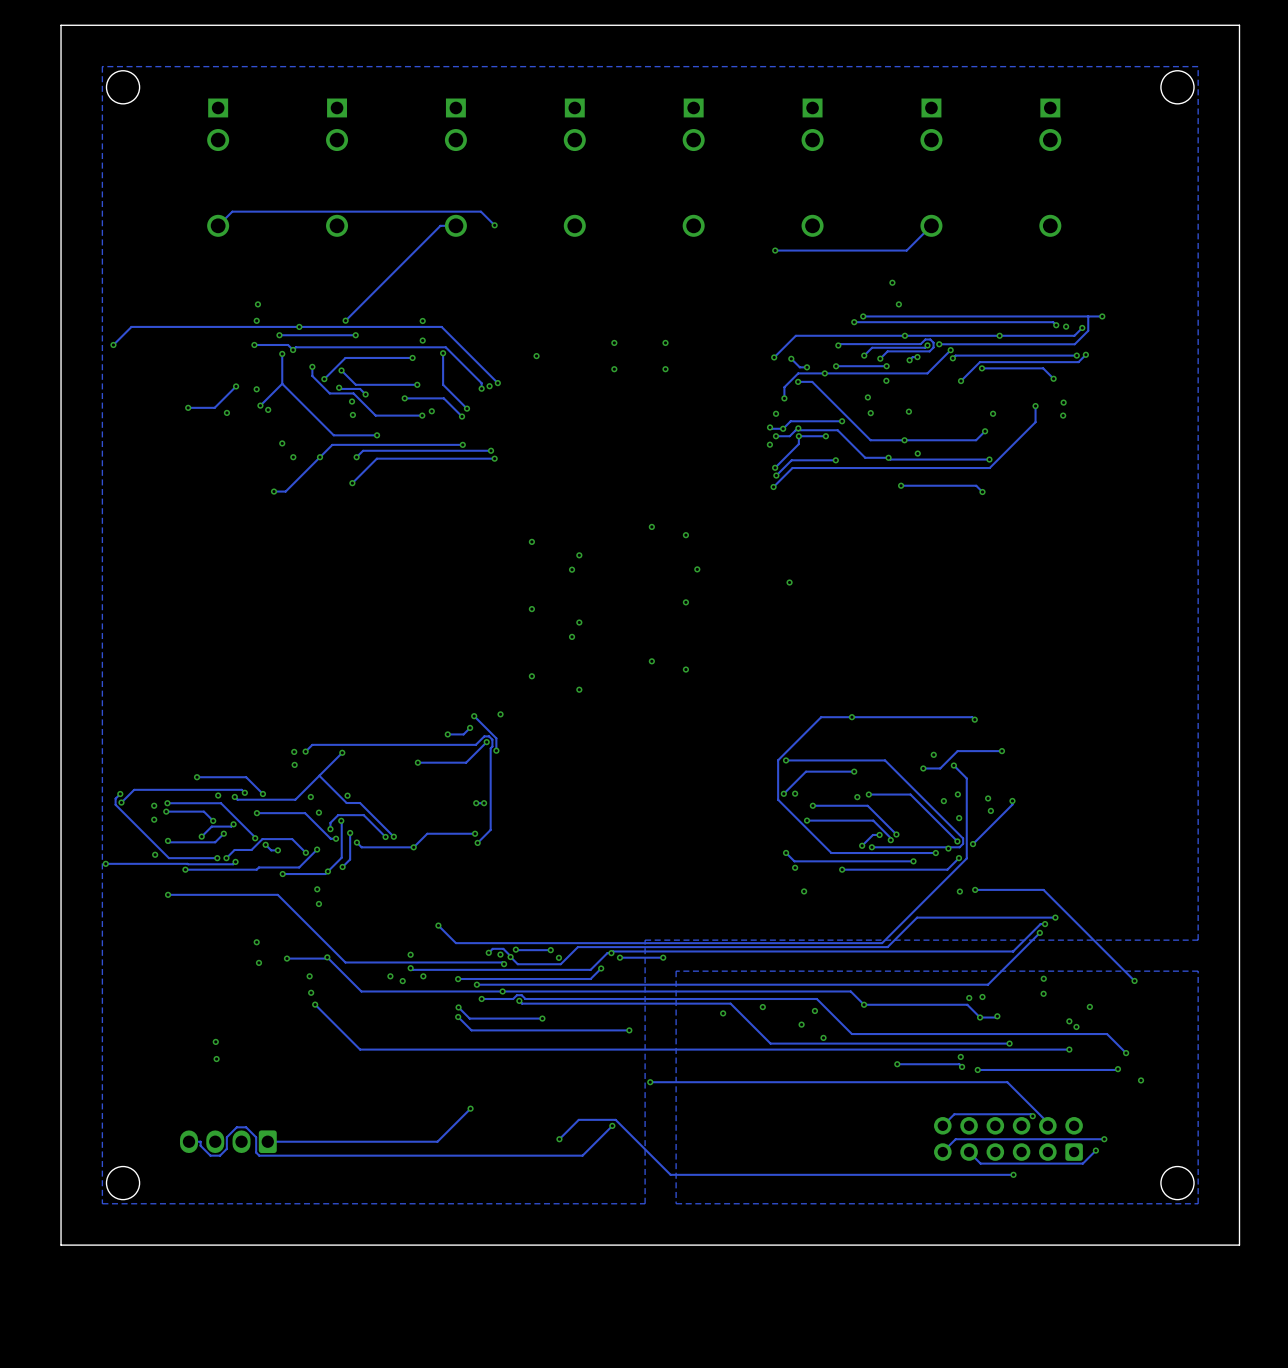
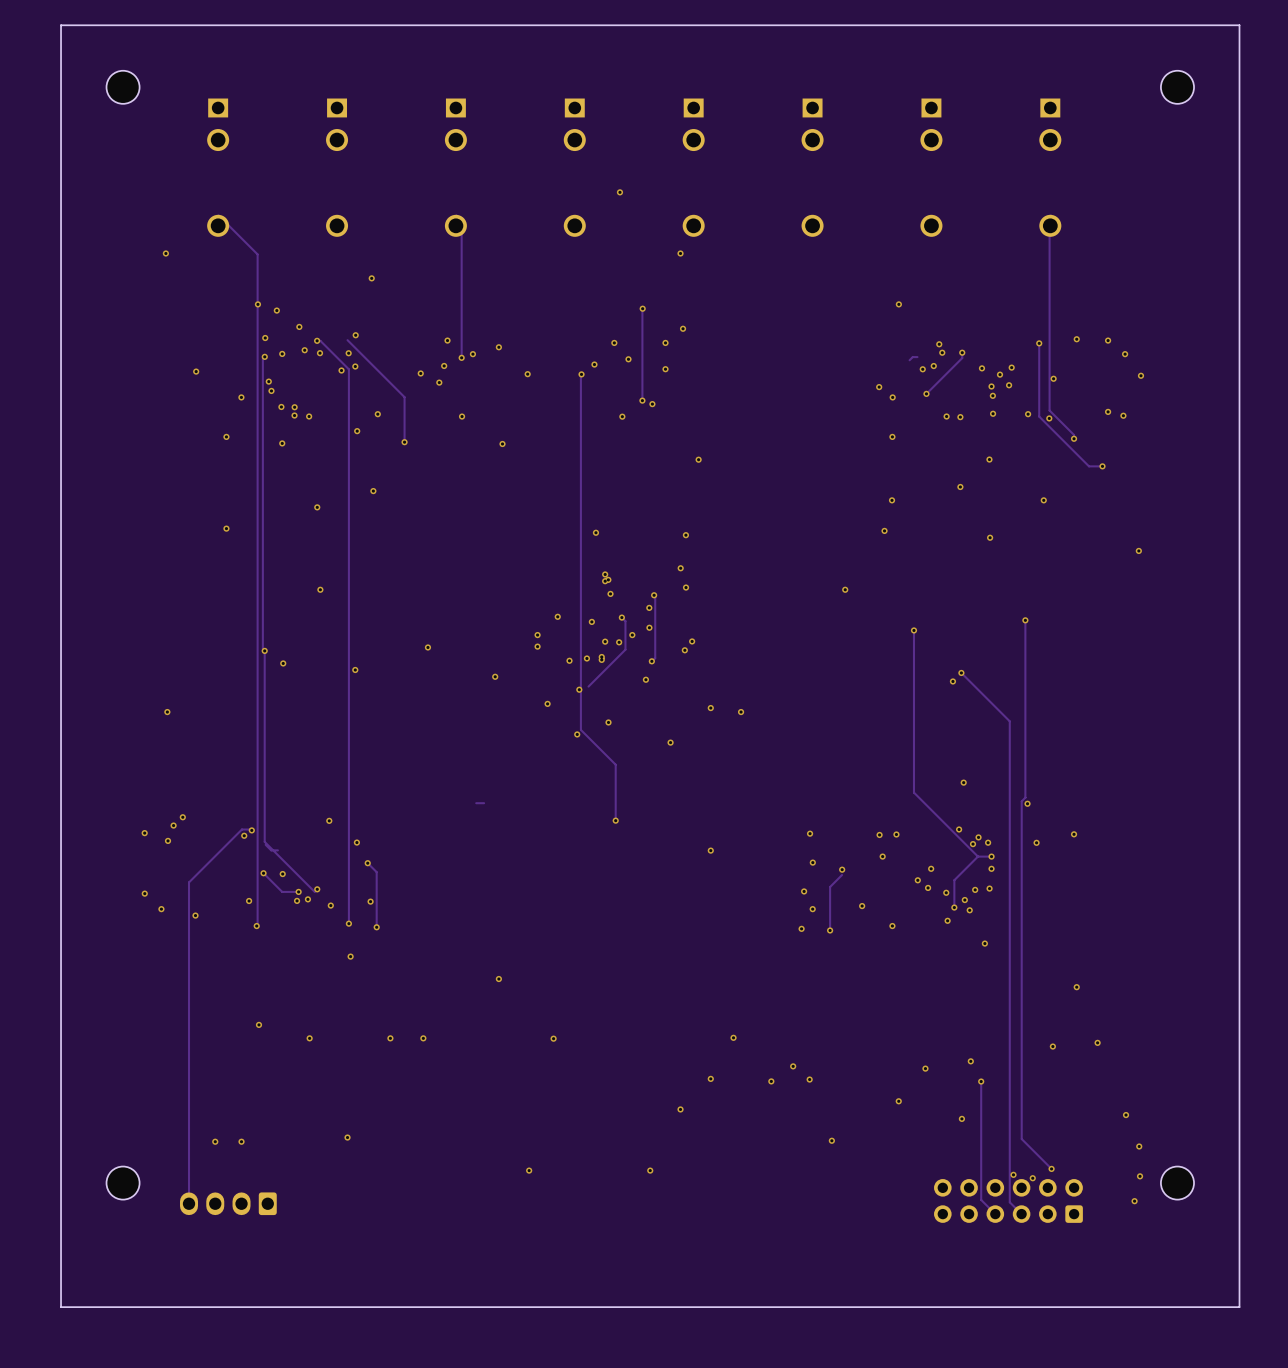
zone outline: (1198, 66) (102, 66) (102, 1203) (645, 1203) (645, 940) (1198, 940) (1198, 66) -> none
via: none -> (619, 192)
track: none -> (218, 215) (257, 254) (256, 926)
track: none -> (456, 215) (461, 220) (461, 357)
track: none -> (1050, 215) (1049, 410) (1074, 434) (1074, 438)
track: (455, 225) (440, 225) (345, 320) -> none
track: (494, 225) (480, 211) (232, 211) (218, 225) -> none
via: (494, 225) -> none
track: (931, 225) (906, 250) (775, 250) -> none
via: (775, 250) -> none
via: none -> (165, 253)
via: none -> (680, 253)
via: none -> (371, 278)
via: (892, 282) -> none
track: none -> (642, 308) (642, 400)
via: none -> (642, 308)
via: none -> (276, 310)
via: (863, 316) -> none
track: (1088, 316) (1088, 330) (1074, 344) (939, 344) -> none
track: (1102, 316) (863, 316) -> none
via: (1102, 316) -> none
via: (256, 320) -> none
via: (345, 320) -> none
via: (422, 320) -> none
track: (854, 322) (1053, 322) (1056, 325) -> none
via: (854, 322) -> none
via: (1056, 325) -> none
via: (1066, 326) -> none
track: (1082, 327) (1074, 335) (795, 335) (774, 357) -> none
via: (1082, 327) -> none
via: none -> (683, 328)
via: (279, 335) -> none
track: (355, 335) (279, 335) -> none
via: (904, 335) -> none
via: (999, 335) -> none
via: none -> (265, 338)
via: none -> (1076, 339)
track: none -> (317, 340) (320, 340) (348, 369) (348, 923)
via: none -> (317, 340)
track: none -> (347, 340) (404, 397) (404, 442)
via: (422, 340) -> none
via: none -> (447, 340)
via: none -> (1108, 340)
track: none -> (1039, 343) (1039, 416) (1089, 466) (1102, 466)
via: none -> (1039, 343)
track: (113, 344) (131, 326) (441, 326) (497, 383) -> none
via: (113, 344) -> none
track: (254, 344) (288, 344) (293, 349) (295, 347) (445, 347) (481, 383) (481, 388) -> none
via: (254, 344) -> none
track: (838, 345) (920, 344) (925, 339) (930, 339) (933, 342) (933, 347) (929, 351) (887, 351) (880, 358) -> none
via: (838, 345) -> none
track: (927, 345) (925, 347) (872, 347) (864, 355) -> none
via: (927, 345) -> none
via: none -> (498, 347)
via: (293, 349) -> none
via: none -> (304, 350)
track: (950, 350) (927, 373) (798, 373) (784, 387) (784, 398) -> none
via: (950, 350) -> none
via: none -> (942, 352)
track: none -> (962, 352) (962, 358) (926, 393)
via: none -> (962, 352)
track: (282, 353) (282, 383) -> none
via: none -> (320, 353)
via: none -> (348, 353)
track: (443, 353) (443, 384) (467, 408) -> none
via: (443, 353) -> none
via: none -> (472, 354)
track: (1085, 354) (1078, 362) (979, 362) (961, 381) -> none
via: (1085, 354) -> none
via: none -> (1125, 354)
via: (864, 355) -> none
track: (1076, 355) (955, 355) (952, 358) -> none
via: (1076, 355) -> none
track: none -> (264, 356) (262, 358) (264, 841) (314, 892)
via: none -> (264, 356)
via: (536, 356) -> none
track: (412, 357) (345, 357) (324, 379) -> none
via: (412, 357) -> none
via: none -> (461, 357)
via: (774, 357) -> none
via: (917, 357) -> none
track: (791, 358) (799, 367) (807, 367) -> none
via: (791, 358) -> none
via: (880, 358) -> none
via: (952, 358) -> none
via: none -> (628, 359)
via: (909, 360) -> none
via: none -> (594, 364)
via: none -> (444, 365)
track: (312, 366) (312, 376) (329, 393) (353, 393) (375, 415) (422, 415) -> none
via: (312, 366) -> none
via: none -> (355, 366)
via: (836, 366) -> none
track: (886, 366) (836, 366) -> none
via: (886, 366) -> none
via: none -> (933, 366)
via: (807, 367) -> none
via: none -> (1011, 367)
track: (981, 368) (1043, 368) (1053, 378) -> none
via: (614, 369) -> none
via: none -> (922, 369)
track: (341, 370) (355, 384) (417, 384) -> none
via: none -> (196, 371)
via: none -> (420, 373)
via: (824, 373) -> none
via: none -> (527, 374)
track: none -> (581, 374) (580, 729) (615, 764) (615, 820)
via: none -> (581, 374)
via: none -> (1000, 374)
via: none -> (1140, 375)
via: (324, 379) -> none
via: (886, 380) -> none
via: none -> (268, 381)
track: (798, 381) (812, 381) (870, 440) (976, 440) (985, 431) -> none
via: (798, 381) -> none
via: (961, 381) -> none
via: none -> (439, 382)
track: (282, 383) (333, 435) (377, 435) -> none
track: (282, 383) (260, 405) -> none
via: (497, 383) -> none
via: (417, 384) -> none
via: none -> (1009, 385)
track: (236, 386) (214, 407) (188, 407) -> none
via: (236, 386) -> none
via: (489, 386) -> none
via: none -> (991, 386)
track: (339, 387) (360, 388) (365, 394) -> none
via: (339, 387) -> none
via: none -> (879, 387)
via: (481, 388) -> none
via: (256, 389) -> none
via: none -> (271, 390)
via: none -> (926, 393)
via: (365, 394) -> none
via: none -> (992, 395)
via: none -> (241, 397)
via: (867, 397) -> none
via: none -> (892, 397)
track: (404, 398) (443, 398) (462, 416) -> none
via: (404, 398) -> none
via: (784, 398) -> none
via: none -> (642, 400)
via: (352, 401) -> none
via: (1063, 402) -> none
via: none -> (652, 404)
via: (260, 405) -> none
via: none -> (281, 406)
track: (1035, 406) (1035, 422) (989, 468) (792, 468) (773, 486) -> none
via: (1035, 406) -> none
via: (188, 407) -> none
via: none -> (294, 407)
via: (467, 408) -> none
via: (268, 409) -> none
via: (431, 411) -> none
via: (908, 411) -> none
via: none -> (1108, 411)
via: (226, 412) -> none
via: (776, 413) -> none
via: (870, 413) -> none
via: (352, 414) -> none
via: none -> (377, 414)
via: none -> (1028, 414)
via: none -> (294, 415)
via: (422, 415) -> none
via: (1063, 415) -> none
via: none -> (1123, 415)
via: none -> (309, 416)
via: none -> (622, 416)
via: none -> (946, 416)
via: none -> (960, 417)
via: none -> (1049, 418)
track: (842, 421) (790, 421) (783, 428) (770, 427) -> none
via: (842, 421) -> none
via: (770, 427) -> none
via: (783, 428) -> none
via: (798, 428) -> none
via: none -> (357, 431)
via: (985, 431) -> none
via: (377, 435) -> none
via: none -> (226, 436)
track: (775, 436) (789, 436) (795, 430) (837, 430) (865, 457) (989, 459) -> none
via: (775, 436) -> none
via: (798, 436) -> none
track: (825, 436) (798, 436) (798, 444) (775, 467) -> none
via: (825, 436) -> none
via: none -> (892, 436)
via: none -> (1074, 438)
via: (904, 440) -> none
via: none -> (404, 442)
via: none -> (502, 443)
track: (462, 444) (332, 444) (285, 491) (274, 491) -> none
via: (462, 444) -> none
via: (769, 444) -> none
track: (491, 450) (363, 450) (356, 457) -> none
via: (491, 450) -> none
via: (917, 453) -> none
via: (293, 457) -> none
via: (320, 457) -> none
via: (356, 457) -> none
via: (888, 457) -> none
track: (494, 458) (376, 458) (352, 483) -> none
via: (494, 458) -> none
via: none -> (698, 459)
track: (835, 460) (791, 460) (776, 475) -> none
via: (835, 460) -> none
via: none -> (1102, 466)
via: (775, 467) -> none
via: (776, 475) -> none
via: (352, 483) -> none
track: (901, 485) (976, 485) (982, 492) -> none
via position: (901, 485) -> (892, 500)
via: (773, 486) -> none
via: (274, 491) -> none
via: none -> (373, 491)
via position: (982, 492) -> (960, 486)
via: none -> (1043, 500)
via: none -> (317, 507)
via: (651, 526) -> none
via: none -> (226, 528)
via: none -> (884, 530)
via: none -> (595, 532)
via: none -> (990, 537)
via: (531, 541) -> none
via: none -> (1138, 550)
via: (579, 555) -> none
via: none -> (680, 568)
via: (572, 569) -> none
via: (697, 569) -> none
via: none -> (605, 574)
via: none -> (608, 579)
via: none -> (605, 581)
via: (789, 582) -> none
via: none -> (686, 587)
via: none -> (320, 589)
via: none -> (845, 589)
via: none -> (610, 593)
track: none -> (654, 595) (655, 658) (650, 663)
via: none -> (654, 595)
via: (685, 602) -> none
via: none -> (649, 607)
via: (531, 609) -> none
via: none -> (557, 616)
track: none -> (621, 617) (625, 621) (625, 649) (588, 686)
via: none -> (621, 617)
track: none -> (1025, 620) (1025, 797) (1021, 801) (1021, 1139) (1051, 1168)
via: none -> (1025, 620)
via: none -> (591, 621)
via: (579, 622) -> none
via: none -> (649, 627)
track: none -> (913, 630) (913, 792) (977, 856)
via: none -> (913, 630)
via: none -> (537, 635)
via: none -> (632, 635)
via: (572, 636) -> none
via: none -> (605, 641)
via: none -> (692, 641)
via: none -> (619, 642)
via: none -> (537, 646)
via: none -> (427, 647)
via: none -> (264, 650)
via: none -> (684, 650)
via: none -> (601, 657)
via: none -> (586, 658)
via: none -> (601, 659)
via: none -> (569, 660)
via: none -> (283, 663)
via: none -> (355, 669)
via: (685, 669) -> none
track: none -> (961, 672) (1009, 721) (1009, 1202) (1021, 1214)
via: none -> (961, 672)
via: none -> (495, 676)
via: (531, 676) -> none
via: none -> (645, 679)
via: none -> (952, 681)
via: none -> (547, 703)
via: none -> (710, 708)
via: none -> (167, 712)
via: none -> (741, 712)
via: (500, 714) -> none
track: (474, 716) (496, 738) (496, 750) -> none
via: (474, 716) -> none
via: (851, 717) -> none
track: (974, 719) (972, 717) (821, 717) (778, 760) (778, 799) (831, 853) (935, 853) -> none
via: (974, 719) -> none
via: none -> (608, 722)
track: (470, 727) (463, 734) (447, 734) -> none
via: (470, 727) -> none
via: (447, 734) -> none
via: none -> (577, 734)
track: (486, 742) (466, 762) (417, 762) -> none
via: (486, 742) -> none
via: none -> (670, 742)
via: (496, 750) -> none
via: (294, 751) -> none
track: (305, 751) (312, 744) (475, 744) (484, 736) (489, 736) (492, 739) (490, 748) (490, 829) (477, 842) -> none
via: (305, 751) -> none
track: (1001, 751) (957, 751) (940, 768) (923, 768) -> none
via: (1001, 751) -> none
track: (342, 752) (319, 775) -> none
via: (342, 752) -> none
via: (933, 754) -> none
track: (786, 760) (885, 760) (963, 838) (963, 843) (959, 847) (871, 847) -> none
via: (786, 760) -> none
via: (417, 762) -> none
via: (294, 764) -> none
track: (953, 765) (966, 778) (966, 858) (882, 943) (455, 943) (438, 925) -> none
via: (953, 765) -> none
via: (923, 768) -> none
track: (854, 771) (805, 771) (783, 793) -> none
via: (854, 771) -> none
track: (319, 775) (295, 799) (237, 799) (234, 796) -> none
track: (319, 775) (346, 803) (360, 803) (393, 836) -> none
track: (197, 777) (246, 777) (262, 793) -> none
via: (197, 777) -> none
via: none -> (963, 782)
track: (244, 792) (241, 789) (134, 789) (121, 802) -> none
via: (244, 792) -> none
via: (262, 793) -> none
via: (783, 793) -> none
via: (795, 793) -> none
track: (120, 794) (115, 798) (115, 804) (168, 858) (217, 858) -> none
via: (120, 794) -> none
track: (868, 794) (910, 794) (957, 841) -> none
via: (868, 794) -> none
via: (957, 794) -> none
via: (218, 795) -> none
via: (347, 795) -> none
via: (234, 796) -> none
via: (310, 797) -> none
via: (857, 797) -> none
via: (988, 798) -> none
track: (1012, 800) (1012, 804) (973, 844) -> none
via position: (1012, 800) -> (1027, 803)
via: (943, 801) -> none
via: (121, 802) -> none
track: (167, 803) (220, 803) (255, 838) -> none
via: (167, 803) -> none
via: (476, 803) -> none
via: (484, 803) -> none
via: (154, 805) -> none
track: (812, 805) (867, 805) (896, 834) -> none
via: (812, 805) -> none
via: (990, 810) -> none
track: (166, 811) (203, 811) (213, 820) -> none
via: (166, 811) -> none
via: (318, 812) -> none
track: (256, 813) (305, 813) (330, 838) (336, 838) -> none
via: (256, 813) -> none
via: none -> (182, 817)
via: (959, 818) -> none
via: (154, 819) -> none
via: (213, 820) -> none
via: none -> (329, 820)
track: (341, 820) (341, 857) (325, 874) (282, 874) -> none
via: (341, 820) -> none
via: none -> (615, 820)
track: (807, 820) (873, 820) (890, 840) -> none
via position: (807, 820) -> (810, 833)
track: (233, 824) (231, 826) (211, 826) (201, 836) -> none
via: (233, 824) -> none
via: none -> (173, 825)
track: (330, 829) (330, 822) (338, 815) (363, 815) (385, 836) -> none
via: (330, 829) -> none
via: none -> (959, 829)
track: none -> (251, 830) (241, 829) (189, 882) (189, 1203)
via: none -> (251, 830)
via: none -> (144, 833)
track: (223, 833) (215, 842) (168, 840) -> none
via: (223, 833) -> none
track: (350, 833) (350, 859) (342, 866) -> none
via: (350, 833) -> none
track: (475, 833) (427, 833) (413, 847) (361, 847) (356, 842) -> none
via: (475, 833) -> none
track: (879, 834) (872, 834) (862, 845) -> none
via: none -> (1074, 834)
via: none -> (244, 835)
via: (201, 836) -> none
via: (385, 836) -> none
via: (393, 836) -> none
via: none -> (978, 837)
via: (255, 838) -> none
via: (336, 838) -> none
via: (890, 840) -> none
via: (957, 841) -> none
via: (477, 842) -> none
via: none -> (988, 842)
via: none -> (1036, 842)
via: (265, 844) -> none
via: (862, 845) -> none
via: (413, 847) -> none
via: (871, 847) -> none
via: (948, 848) -> none
track: (317, 849) (299, 867) (185, 869) -> none
via: (317, 849) -> none
via: (277, 850) -> none
via: none -> (710, 850)
track: (305, 852) (292, 839) (262, 839) (251, 849) (234, 849) (226, 858) -> none
via: (305, 852) -> none
track: (786, 852) (794, 861) (913, 861) -> none
via: (786, 852) -> none
via: (935, 853) -> none
via: (155, 854) -> none
via: none -> (882, 856)
track: none -> (977, 856) (954, 880) (954, 907)
track: none -> (991, 856) (977, 856)
via: none -> (991, 856)
via: (217, 858) -> none
via: (226, 858) -> none
track: (958, 858) (947, 869) (842, 869) -> none
via: (958, 858) -> none
track: (235, 861) (233, 864) (105, 863) -> none
via: (235, 861) -> none
via: (913, 861) -> none
via: none -> (812, 862)
via: (105, 863) -> none
track: none -> (367, 863) (376, 872) (376, 927)
via: none -> (367, 863)
via: (342, 866) -> none
via: (795, 867) -> none
via: none -> (931, 868)
via: none -> (991, 868)
via: (185, 869) -> none
via: (327, 871) -> none
track: none -> (263, 873) (282, 891) (298, 891)
via: none -> (263, 873)
track: none -> (842, 875) (830, 886) (830, 930)
via: none -> (917, 880)
via: none -> (928, 887)
via: none -> (989, 888)
track: (975, 889) (1043, 889) (1134, 980) -> none
via: none -> (298, 891)
via: (959, 891) -> none
via: none -> (946, 892)
via: none -> (144, 893)
track: (168, 894) (277, 894) (345, 962) (502, 962) (504, 964) -> none
via: (168, 894) -> none
via: none -> (307, 899)
via: none -> (249, 900)
via: none -> (297, 900)
via: none -> (964, 900)
via: none -> (370, 901)
via: (318, 903) -> none
via: none -> (330, 905)
via: none -> (862, 906)
via: none -> (954, 907)
via: none -> (161, 909)
via: none -> (812, 909)
via: none -> (969, 910)
via: none -> (195, 915)
track: (1055, 917) (917, 917) (887, 947) (577, 947) (560, 964) (517, 964) (503, 948) (492, 948) (488, 952) -> none
via: (1055, 917) -> none
via: none -> (947, 920)
via: none -> (348, 923)
track: (1045, 924) (1040, 924) (1013, 951) (613, 951) (607, 953) (590, 969) (412, 969) (410, 968) -> none
via: (1045, 924) -> none
via: (438, 925) -> none
via: none -> (892, 926)
via: none -> (376, 927)
via: none -> (801, 928)
via: none -> (830, 930)
track: (1039, 932) (988, 984) (476, 984) -> none
via: (1039, 932) -> none
via position: (256, 942) -> (256, 926)
via: none -> (984, 943)
track: (515, 949) (550, 950) -> none
via: (515, 949) -> none
via: (550, 950) -> none
via: (488, 952) -> none
via: (611, 953) -> none
via: (410, 954) -> none
via: (500, 954) -> none
via: none -> (350, 956)
via: (327, 957) -> none
via: (510, 957) -> none
via: (558, 957) -> none
via: (619, 957) -> none
track: (663, 957) (619, 957) -> none
via: (663, 957) -> none
track: (286, 958) (327, 957) (361, 991) (850, 991) (864, 1004) (967, 1004) (980, 1017) (997, 1016) -> none
via: (286, 958) -> none
via: (258, 962) -> none
via: (504, 964) -> none
via: (410, 968) -> none
track: (601, 968) (590, 978) (458, 978) -> none
via: (601, 968) -> none
zone outline: (1198, 971) (1198, 1203) (676, 1203) (676, 971) (1198, 971) -> none
via: (309, 976) -> none
via: (390, 976) -> none
via: (423, 976) -> none
via: (1043, 978) -> none
via: (458, 979) -> none
via: none -> (498, 979)
via: (1134, 980) -> none
via: (402, 981) -> none
via: (476, 984) -> none
via: none -> (1076, 987)
via: (502, 991) -> none
via: (311, 992) -> none
via: (1043, 993) -> none
via: (982, 997) -> none
track: (481, 998) (513, 998) (516, 995) (521, 995) (525, 998) (816, 998) (851, 1034) (1107, 1034) (1126, 1053) -> none
via: (481, 998) -> none
via: (969, 998) -> none
track: (519, 1000) (522, 1003) (730, 1003) (770, 1043) (1009, 1043) -> none
via: (519, 1000) -> none
track: (315, 1004) (360, 1049) (1069, 1049) -> none
via: (315, 1004) -> none
via: (864, 1004) -> none
via: (1089, 1006) -> none
track: (458, 1007) (469, 1018) (542, 1018) -> none
via: (458, 1007) -> none
via: (762, 1007) -> none
via: (814, 1010) -> none
via: (723, 1013) -> none
via: (997, 1016) -> none
track: (458, 1017) (471, 1030) (629, 1030) -> none
via: (458, 1017) -> none
via: (980, 1017) -> none
via position: (542, 1018) -> (553, 1038)
via: (1069, 1021) -> none
via: none -> (258, 1024)
via: (801, 1024) -> none
via: (1076, 1026) -> none
via: (629, 1030) -> none
via: none -> (733, 1037)
via: (823, 1037) -> none
via: none -> (309, 1038)
via: none -> (390, 1038)
via: none -> (423, 1038)
via: (215, 1041) -> none
via: none -> (1097, 1042)
via: (1009, 1043) -> none
via: none -> (1052, 1046)
via: (1069, 1049) -> none
via: (1126, 1053) -> none
via: (960, 1056) -> none
via: (216, 1059) -> none
via: none -> (970, 1061)
track: (897, 1064) (959, 1064) (962, 1066) -> none
via: (897, 1064) -> none
via: none -> (793, 1066)
via: (962, 1066) -> none
via: none -> (925, 1068)
via: (977, 1069) -> none
track: (1117, 1069) (977, 1069) -> none
via: (1117, 1069) -> none
via: none -> (710, 1078)
via: none -> (809, 1079)
via: (1141, 1080) -> none
via: none -> (771, 1081)
track: none -> (981, 1081) (981, 1199) (995, 1214)
via: none -> (981, 1081)
track: (650, 1082) (1007, 1082) (1047, 1122) (1047, 1125) -> none
via: (650, 1082) -> none
via: none -> (898, 1101)
track: (470, 1108) (437, 1141) (267, 1141) -> none
via: (470, 1108) -> none
via: none -> (680, 1109)
via: none -> (1126, 1115)
track: (1032, 1116) (1030, 1114) (954, 1114) (942, 1125) -> none
via: (1032, 1116) -> none
via: none -> (961, 1118)
track: (612, 1125) (582, 1155) (259, 1155) (256, 1152) (256, 1137) (246, 1127) (236, 1127) (226, 1137) (226, 1148) (220, 1155) (210, 1155) (200, 1145) (200, 1141) (189, 1141) -> none
via: (612, 1125) -> none
via: none -> (347, 1137)
part position: (1008, 1138) -> (1008, 1200)
track: (559, 1139) (578, 1119) (615, 1119) (670, 1174) (1013, 1174) -> none
via: (559, 1139) -> none
track: (1104, 1139) (955, 1139) (942, 1152) -> none
via: (1104, 1139) -> none
via: none -> (831, 1140)
part position: (228, 1141) -> (228, 1203)
via: none -> (1139, 1146)
track: (1095, 1150) (1082, 1163) (980, 1163) (969, 1152) -> none
via: (1095, 1150) -> none
via: none -> (1051, 1168)
via: none -> (529, 1170)
via: none -> (650, 1170)
via: none -> (1140, 1176)
via: none -> (1032, 1178)
via: none -> (1134, 1201)
board edge: (1239, 1245) (61, 1245) -> (1239, 1245) (1239, 1307) (61, 1307) (61, 1245)

